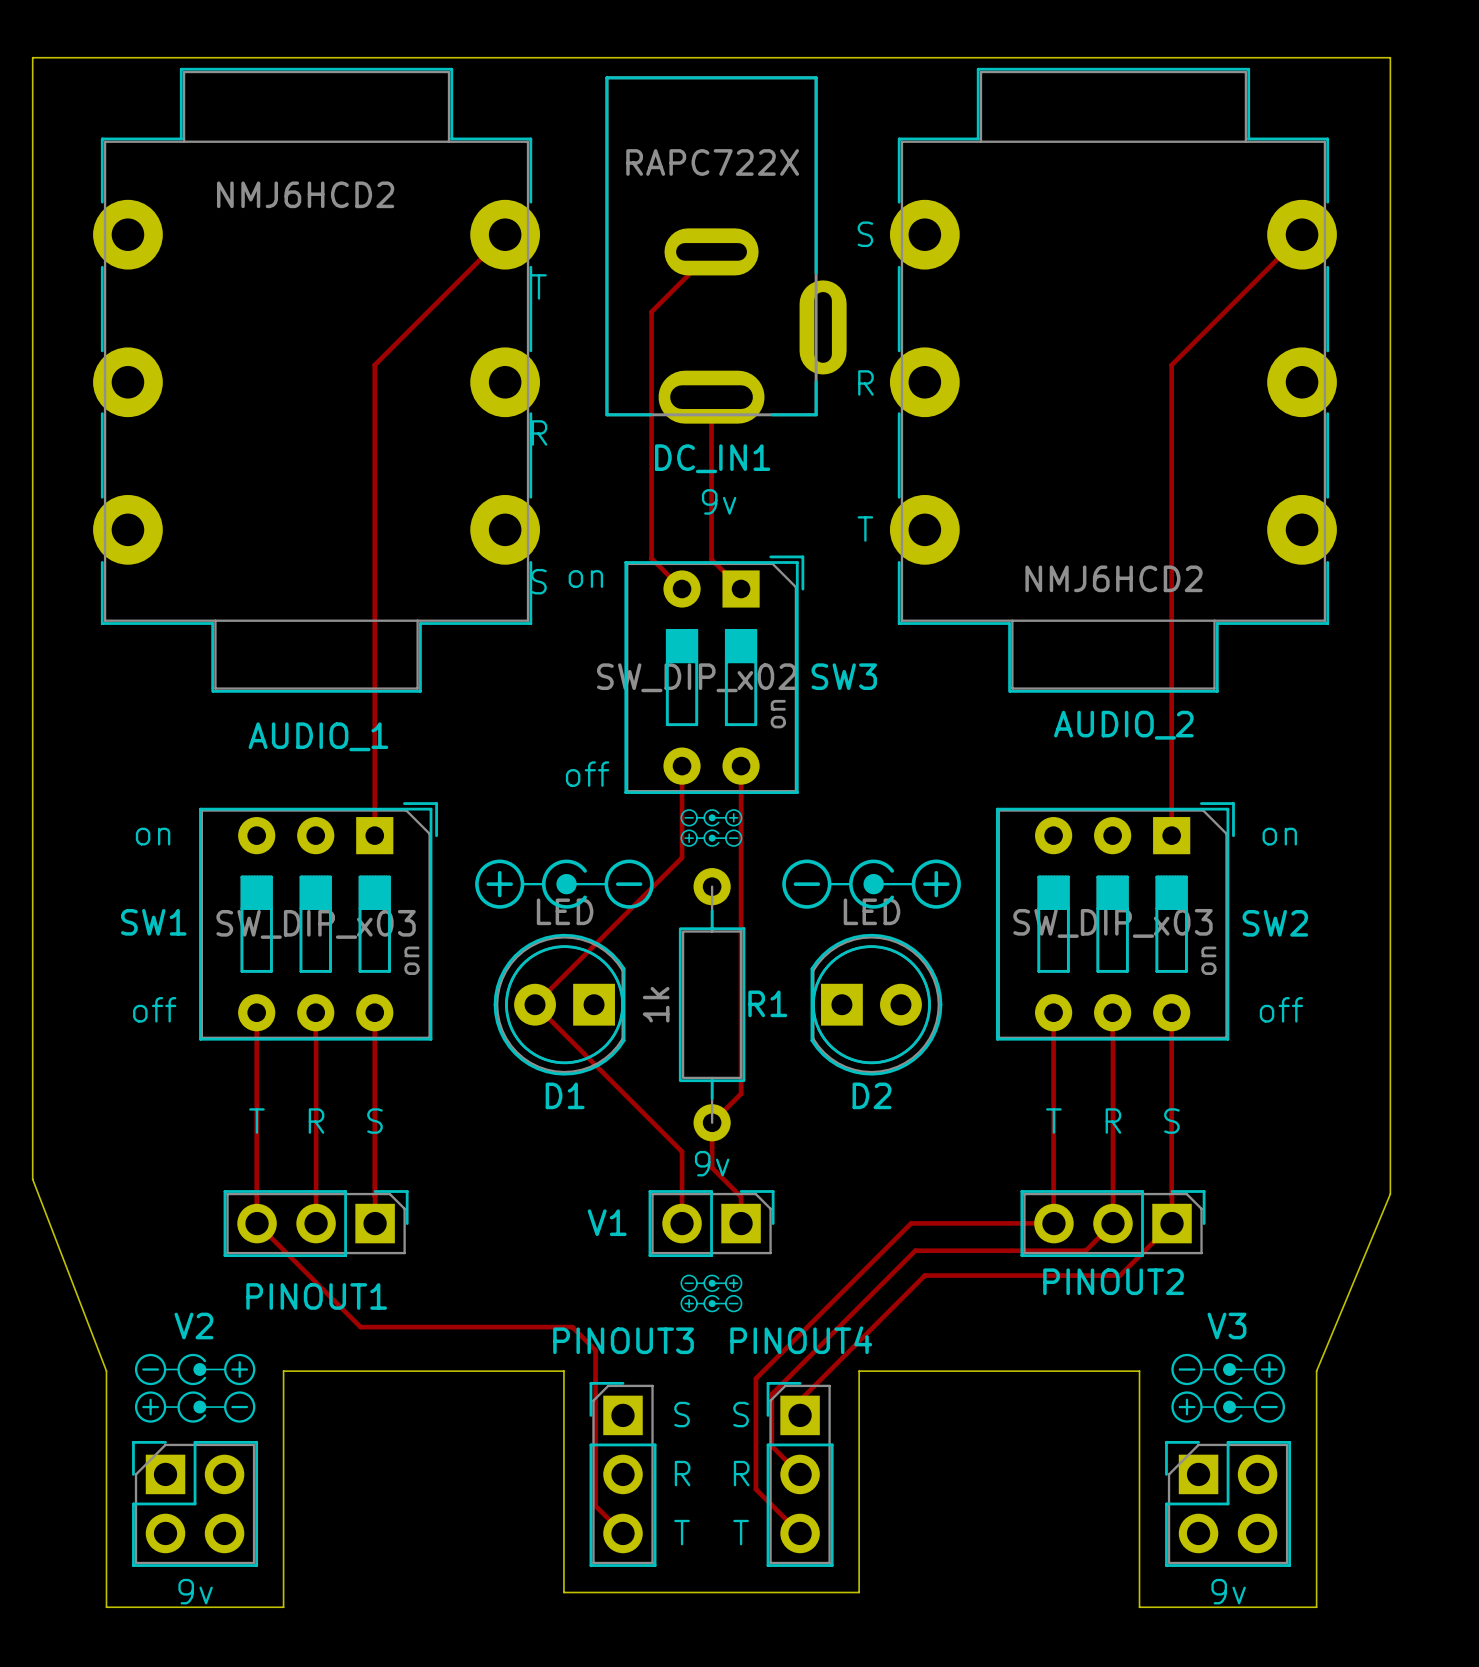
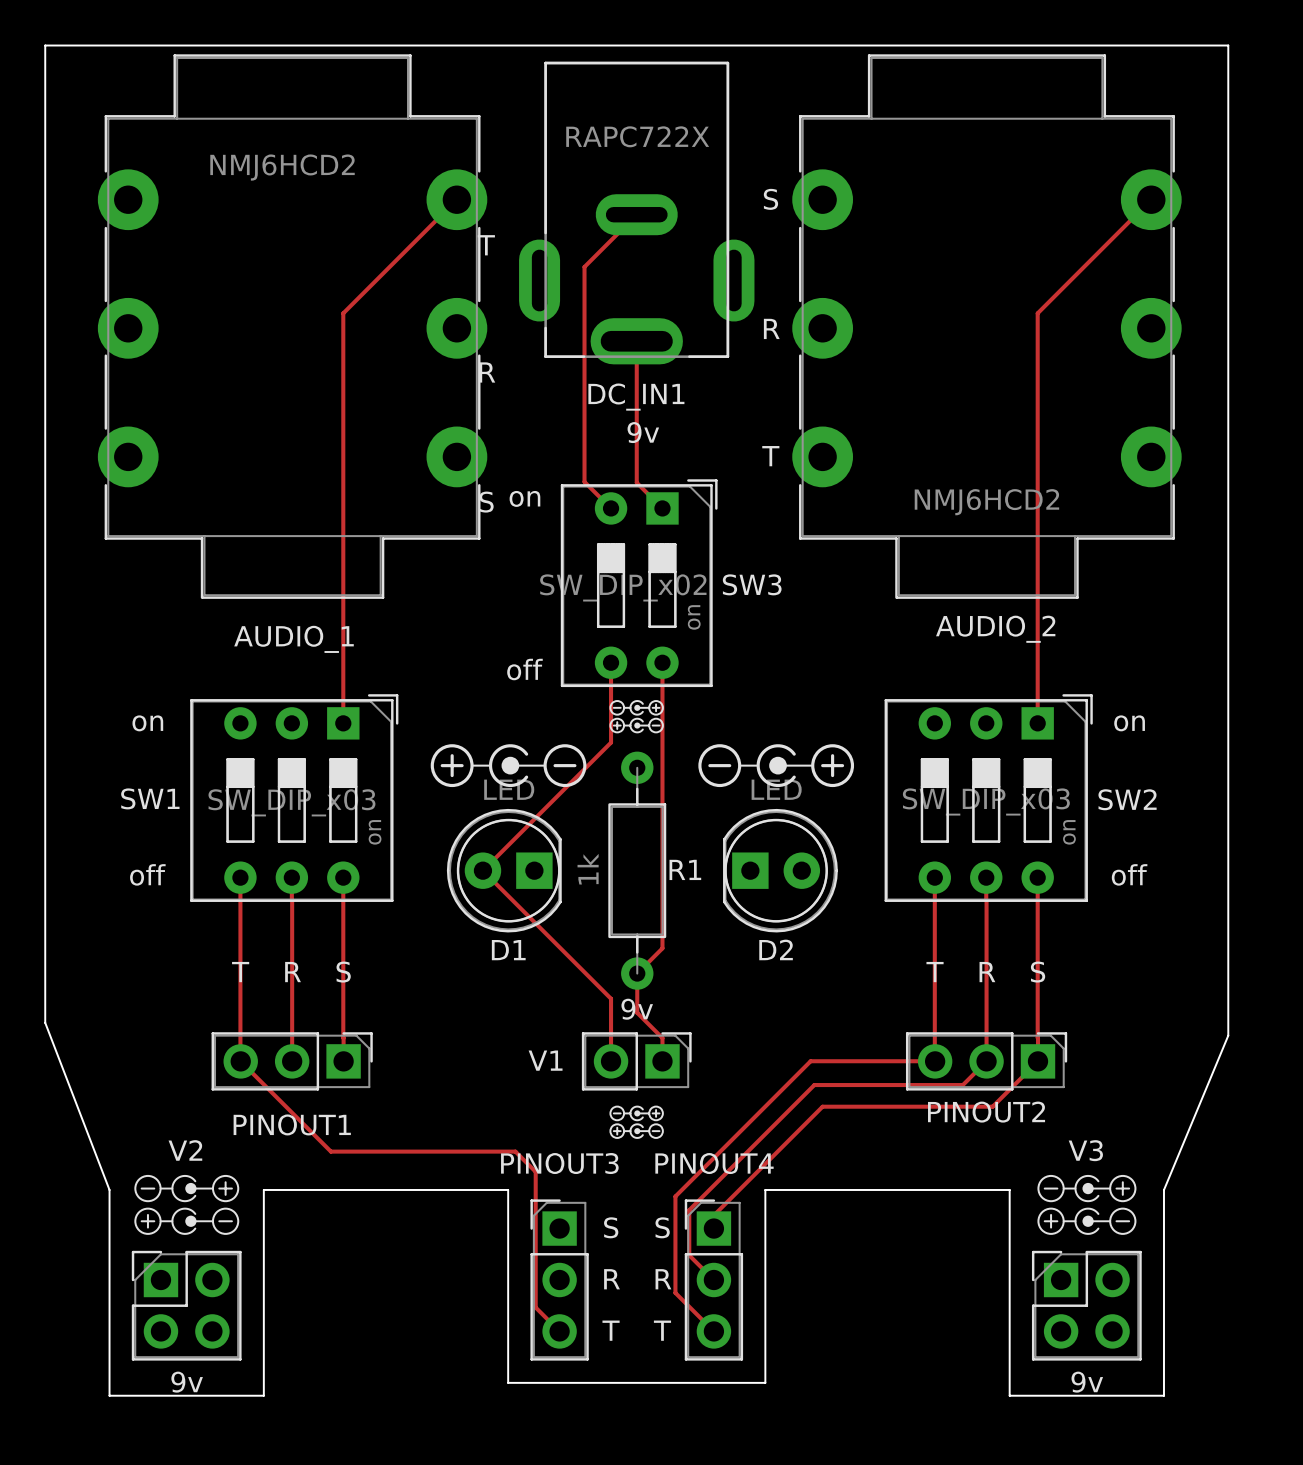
DC_IN1 footprint: [605, 76, 847, 424] -> [519, 61, 755, 365]

